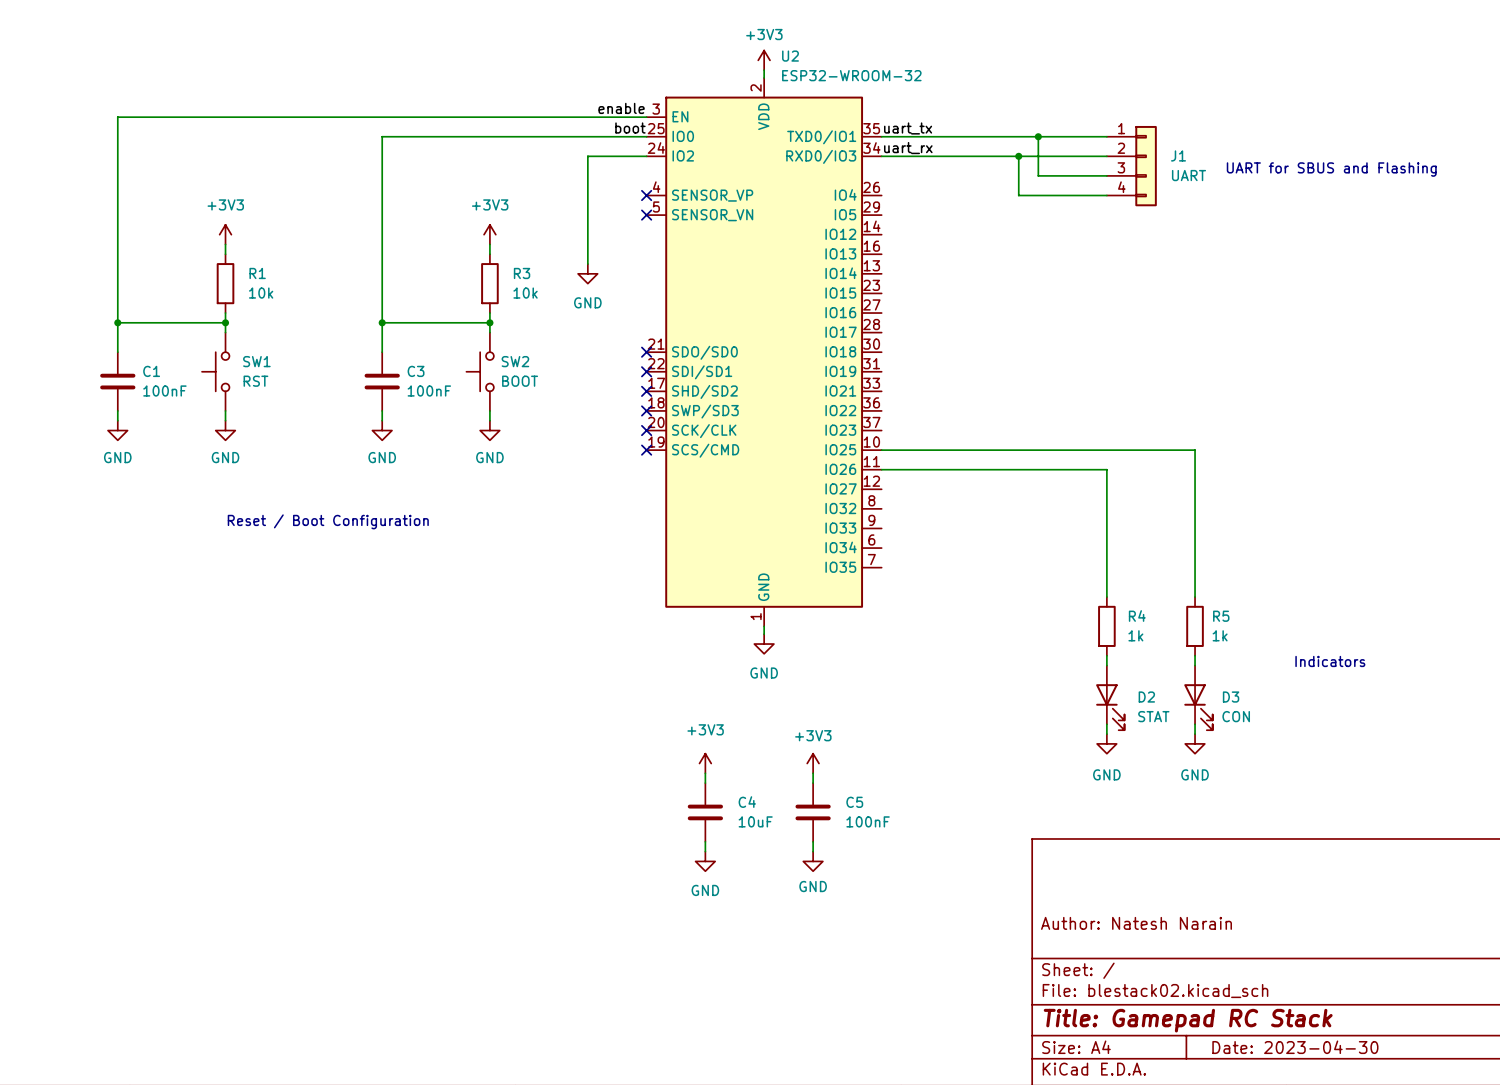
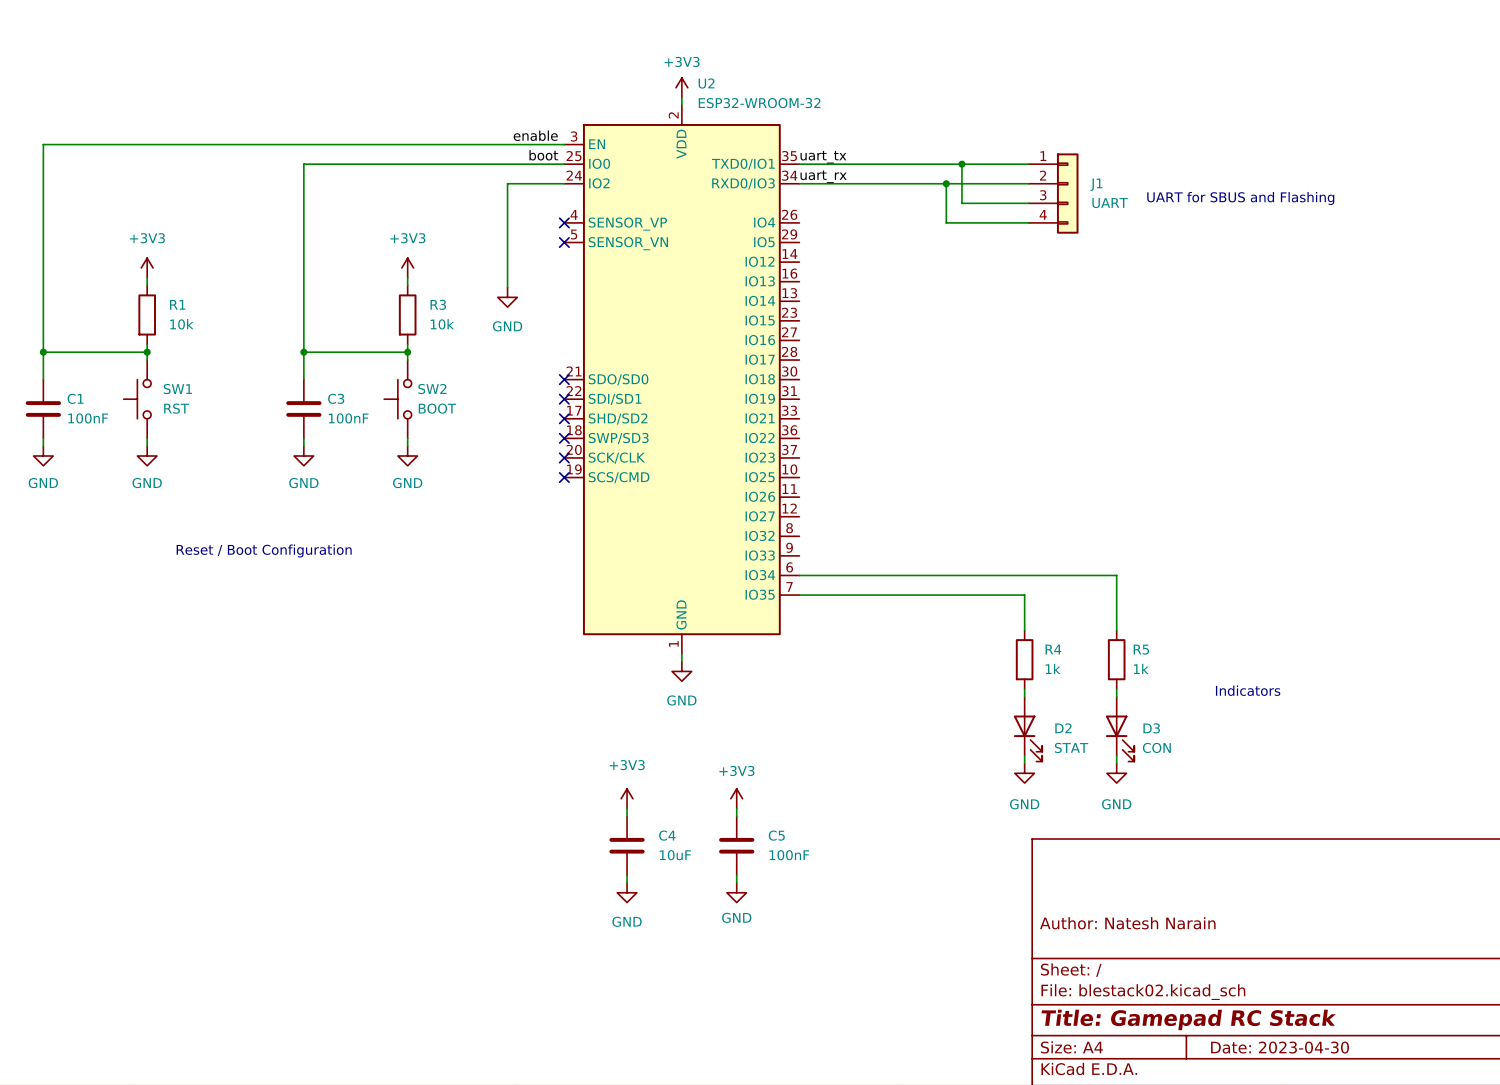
power symbol position: +3V3 (764, 60) -> +3V3 (681, 87)
label position: enable (621, 108) -> enable (535, 135)
wire: (646, 117) (117, 117) (117, 352) -> none
label position: boot (630, 128) -> boot (543, 155)
label position: uart_tx (908, 128) -> uart_tx (823, 157)
wire: (646, 136) (382, 136) (382, 352) -> none
wire: (881, 136) (1106, 136) -> none
wire: (1038, 136) (1038, 175) (1106, 175) -> none
junction: (1038, 136) -> none
wire: none -> (564, 144) (43, 144) (43, 379)
label position: uart_rx (908, 148) -> uart_rx (823, 176)
wire: (881, 156) (1106, 156) -> none
wire: (1018, 156) (1018, 195) (1106, 195) -> none
junction: (1018, 156) -> none
wire: none -> (564, 164) (303, 164) (303, 379)
wire: none -> (799, 164) (1028, 164)
wire: none -> (961, 164) (961, 203) (1028, 203)
junction: none -> (961, 164)
J1 position: (1131, 166) -> (1053, 193)
text position: UART for SBUS and Flashing (1331, 169) -> UART for SBUS and Flashing (1240, 198)
wire: none -> (564, 183) (507, 183) (507, 287)
wire: none -> (799, 183) (1028, 183)
wire: none -> (946, 183) (946, 222) (1028, 222)
junction: none -> (946, 183)
no-connect mark: (646, 195) -> none
no-connect mark: (646, 215) -> none
no-connect mark: none -> (564, 222)
power symbol position: +3V3 (225, 234) -> +3V3 (147, 267)
power symbol position: +3V3 (489, 234) -> +3V3 (407, 267)
no-connect mark: none -> (564, 242)
wire: (225, 244) (225, 254) -> none
wire: (489, 244) (489, 254) -> none
power symbol: GND (587, 273) -> none
wire: none -> (147, 277) (147, 285)
wire: none -> (407, 277) (407, 285)
R1 position: (225, 283) -> (147, 314)
R3 position: (489, 283) -> (407, 314)
power symbol: none -> GND (507, 297)
wire: (225, 313) (225, 332) -> none
wire: (489, 313) (489, 332) -> none
wire: (117, 322) (225, 322) -> none
junction: (117, 322) -> none
junction: (225, 322) -> none
wire: (382, 322) (489, 322) -> none
junction position: (382, 322) -> (407, 352)
junction: (489, 322) -> none
wire: none -> (147, 344) (147, 360)
wire: none -> (407, 344) (407, 360)
wire: none -> (43, 352) (147, 352)
junction: none -> (43, 352)
junction: none -> (147, 352)
wire: none -> (303, 352) (407, 352)
junction: none -> (303, 352)
no-connect mark: (646, 352) -> none
U2 position: (764, 352) -> (681, 379)
SW1 position: (215, 371) -> (137, 399)
SW2 position: (480, 371) -> (397, 399)
no-connect mark: (646, 371) -> none
no-connect mark: none -> (564, 379)
C1 position: (117, 381) -> (43, 408)
C3 position: (382, 381) -> (303, 408)
no-connect mark: (646, 391) -> none
no-connect mark: none -> (564, 399)
wire: (117, 410) (117, 420) -> none
wire: (225, 410) (225, 420) -> none
wire: (382, 410) (382, 420) -> none
wire: (489, 410) (489, 420) -> none
no-connect mark: (646, 410) -> none
no-connect mark: none -> (564, 418)
power symbol position: GND (117, 430) -> GND (147, 455)
power symbol: GND (225, 430) -> none
power symbol position: GND (382, 430) -> GND (407, 455)
power symbol: GND (489, 430) -> none
no-connect mark: (646, 430) -> none
wire: none -> (43, 438) (43, 446)
wire: none -> (147, 438) (147, 446)
wire: none -> (303, 438) (303, 446)
wire: none -> (407, 438) (407, 446)
no-connect mark: none -> (564, 438)
no-connect mark: (646, 450) -> none
wire: (881, 450) (1195, 450) (1195, 597) -> none
power symbol: none -> GND (43, 455)
power symbol: none -> GND (303, 455)
no-connect mark: none -> (564, 457)
wire: (881, 469) (1106, 469) (1106, 597) -> none
no-connect mark: none -> (564, 477)
text position: Reset / Boot Configuration (328, 521) -> Reset / Boot Configuration (264, 551)
wire: none -> (799, 575) (1116, 575) (1116, 630)
wire: none -> (799, 595) (1024, 595) (1024, 630)
R4 position: (1106, 626) -> (1024, 659)
R5 position: (1195, 626) -> (1116, 659)
power symbol position: GND (764, 644) -> GND (681, 671)
wire: (1106, 655) (1106, 665) -> none
wire: (1195, 655) (1195, 665) -> none
text position: Indicators (1330, 661) -> Indicators (1248, 690)
wire: none -> (1024, 689) (1024, 696)
wire: none -> (1116, 689) (1116, 696)
D2 position: (1110, 697) -> (1028, 729)
D3 position: (1198, 697) -> (1120, 729)
wire: (1106, 724) (1106, 734) -> none
wire: (1195, 724) (1195, 734) -> none
power symbol position: GND (1106, 743) -> GND (1116, 773)
power symbol: GND (1195, 743) -> none
wire: none -> (1024, 755) (1024, 763)
wire: none -> (1116, 755) (1116, 763)
power symbol: +3V3 (705, 763) -> none
power symbol: +3V3 (813, 763) -> none
wire: (705, 773) (705, 783) -> none
wire: (813, 773) (813, 783) -> none
power symbol: none -> GND (1024, 773)
power symbol: none -> +3V3 (627, 798)
power symbol: none -> +3V3 (736, 798)
wire: none -> (627, 808) (627, 816)
wire: none -> (736, 808) (736, 816)
C4 position: (705, 812) -> (627, 845)
C5 position: (813, 812) -> (736, 845)
wire: (705, 841) (705, 851) -> none
wire: (813, 841) (813, 851) -> none
power symbol: GND (705, 861) -> none
power symbol: GND (813, 861) -> none
wire: none -> (627, 875) (627, 882)
wire: none -> (736, 875) (736, 882)
power symbol: none -> GND (627, 892)
power symbol: none -> GND (736, 892)

